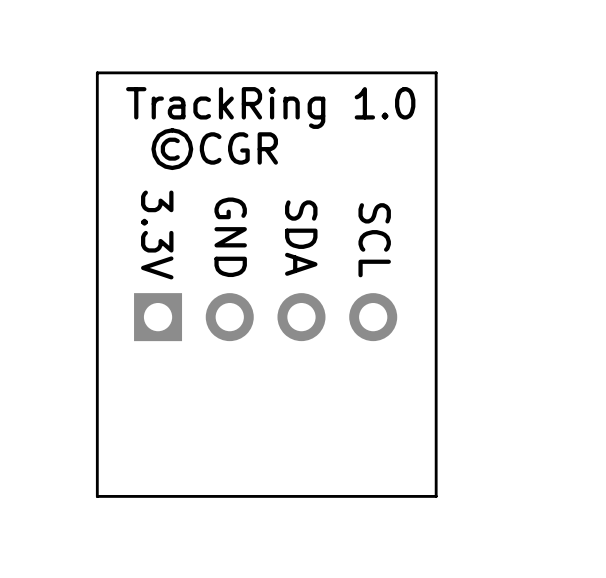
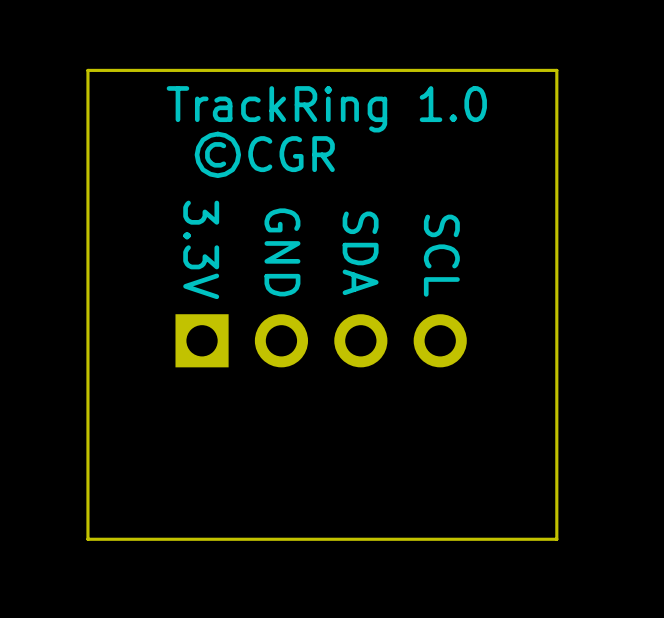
board edge: (97, 72) (97, 496) -> (134, 70) (87, 70) (87, 539) (134, 539)
board edge: (436, 72) (436, 496) -> (509, 70) (556, 70) (556, 539) (509, 539)

